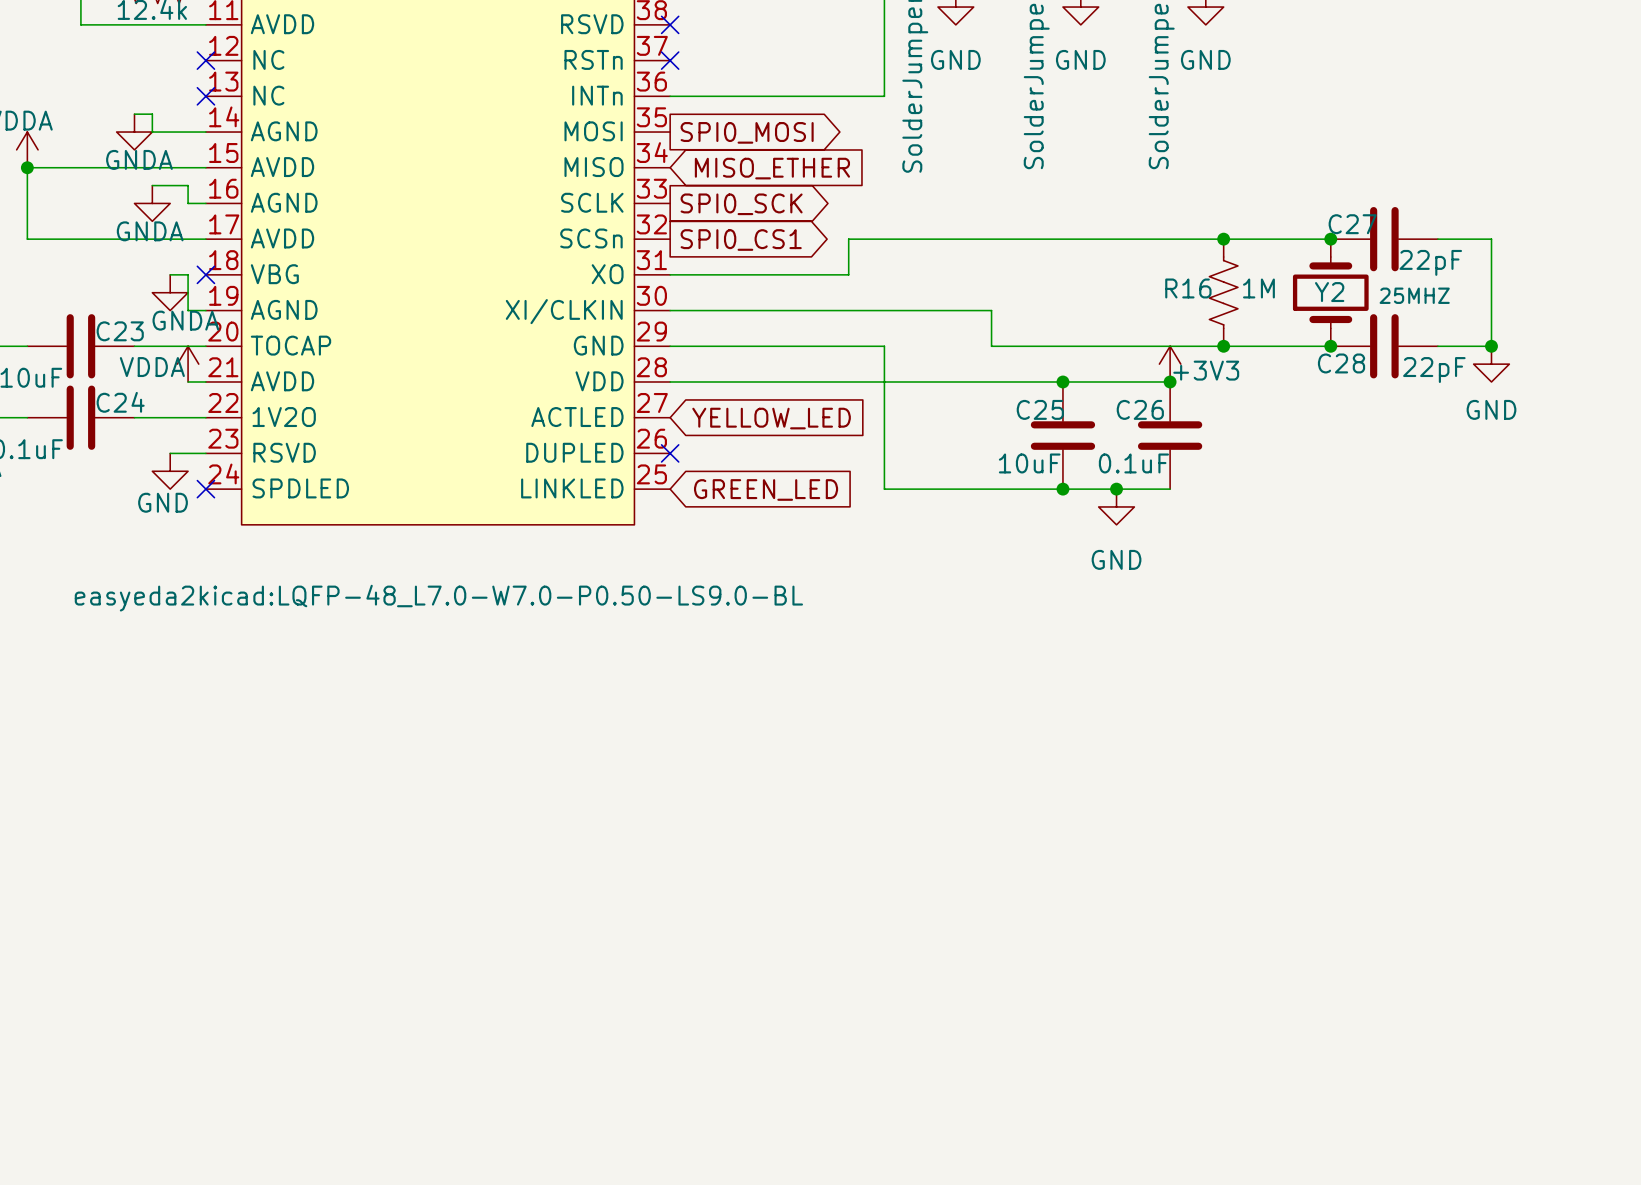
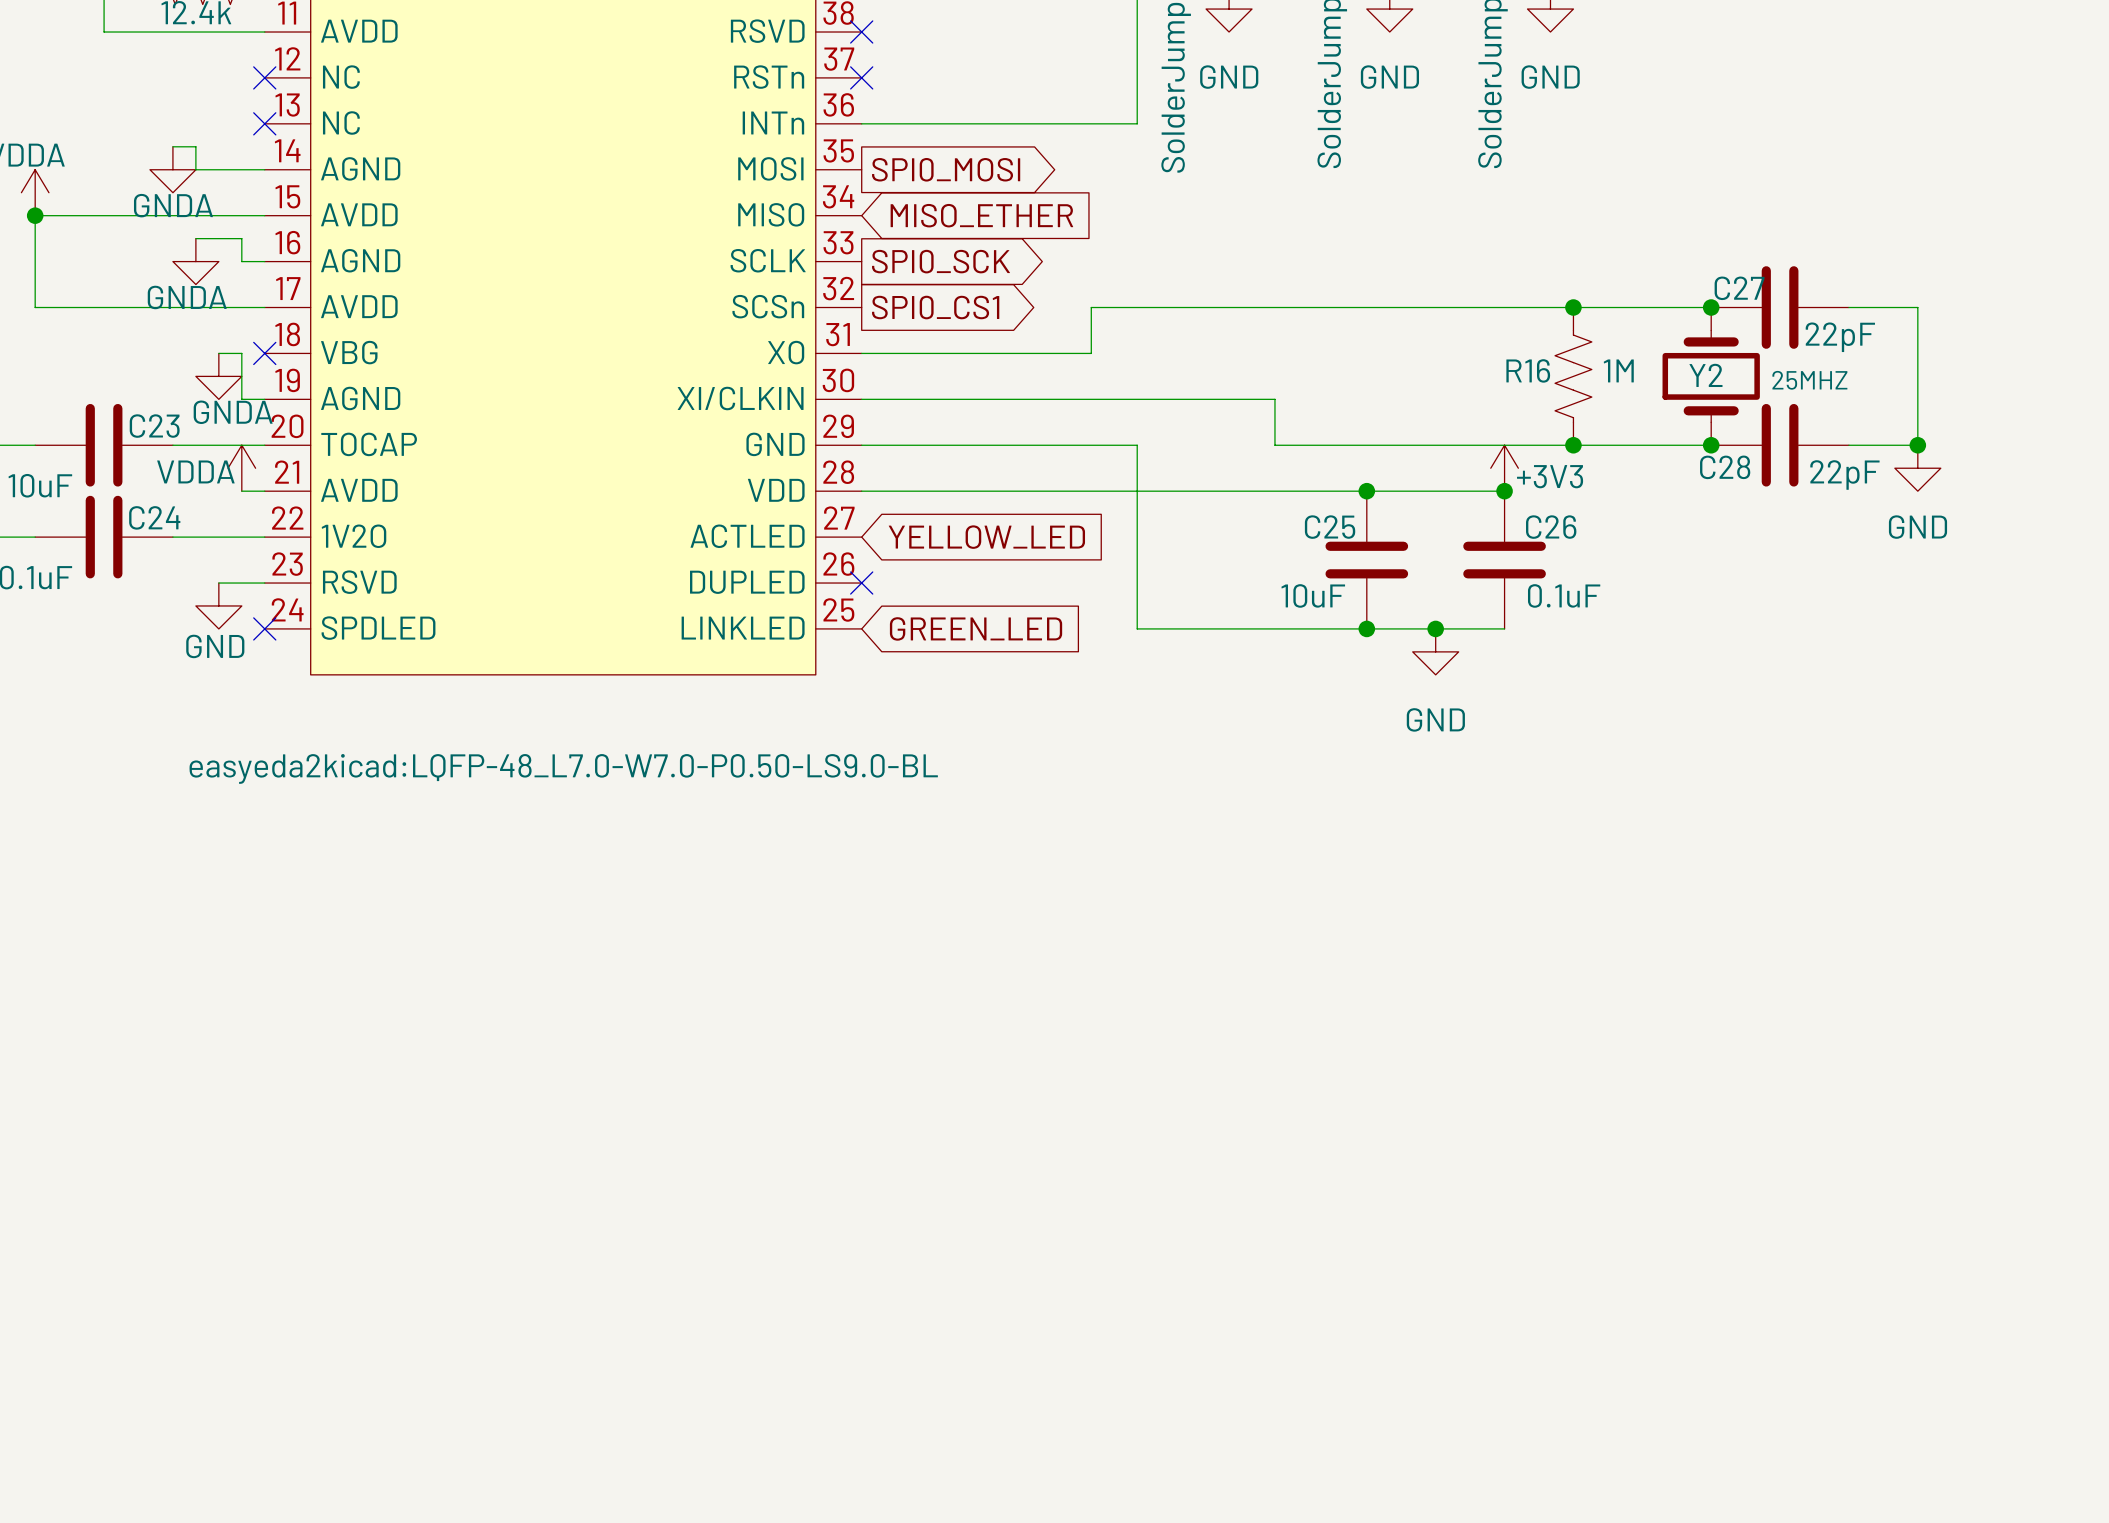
C26 name position: C26 (1140, 409) -> C26 (1551, 527)
C26 value position: 0.1uF (1133, 463) -> 0.1uF (1564, 595)

